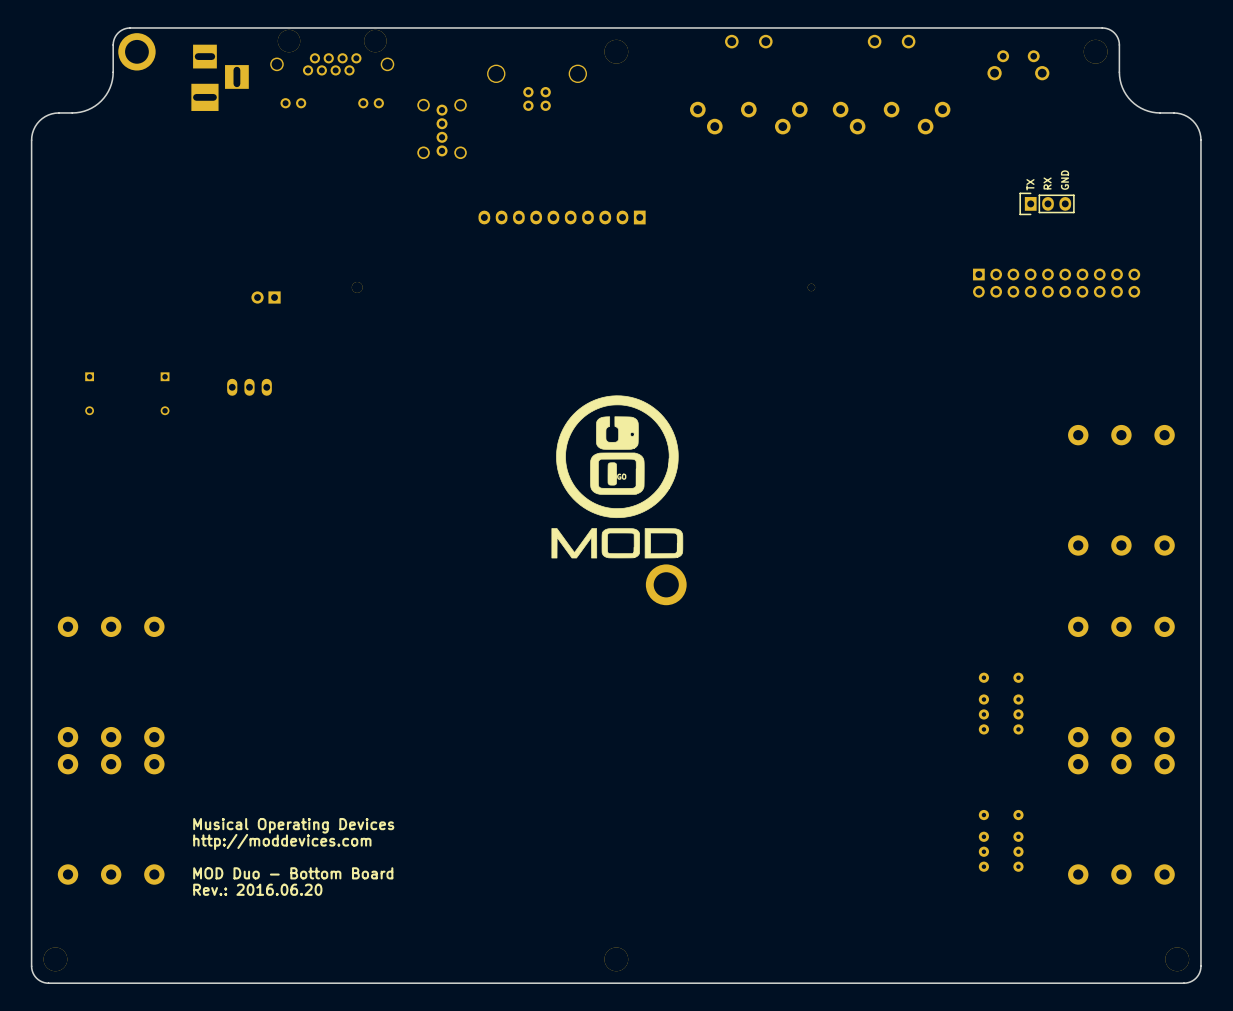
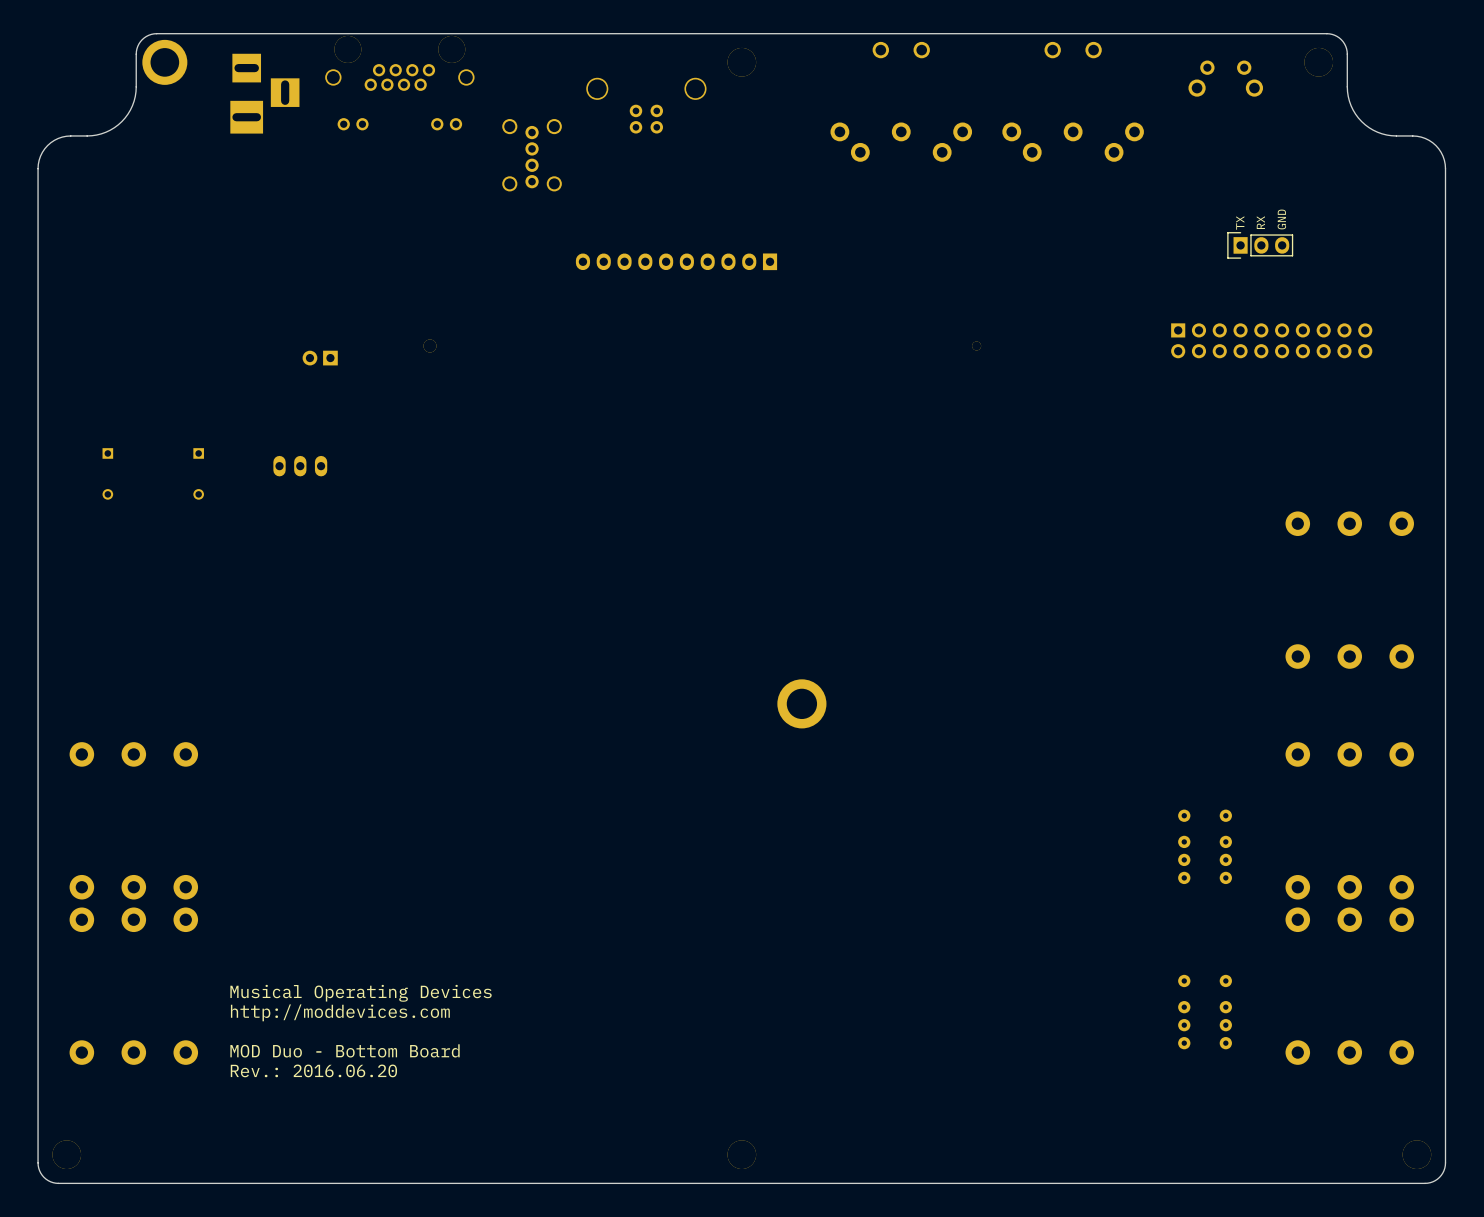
drawing: [551, 395, 684, 559] -> none

